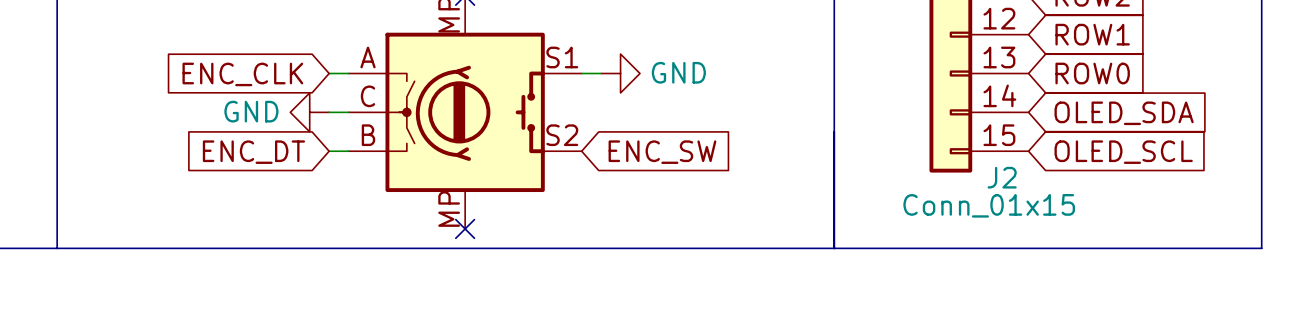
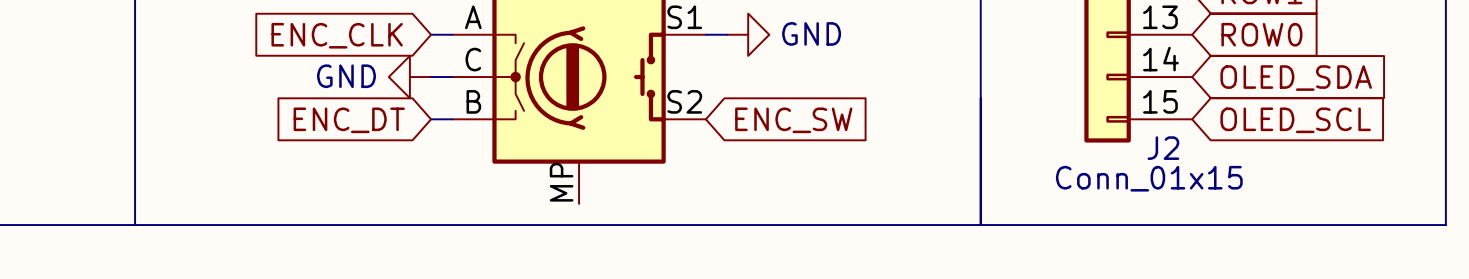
no-connect mark: (465, 228) -> none

